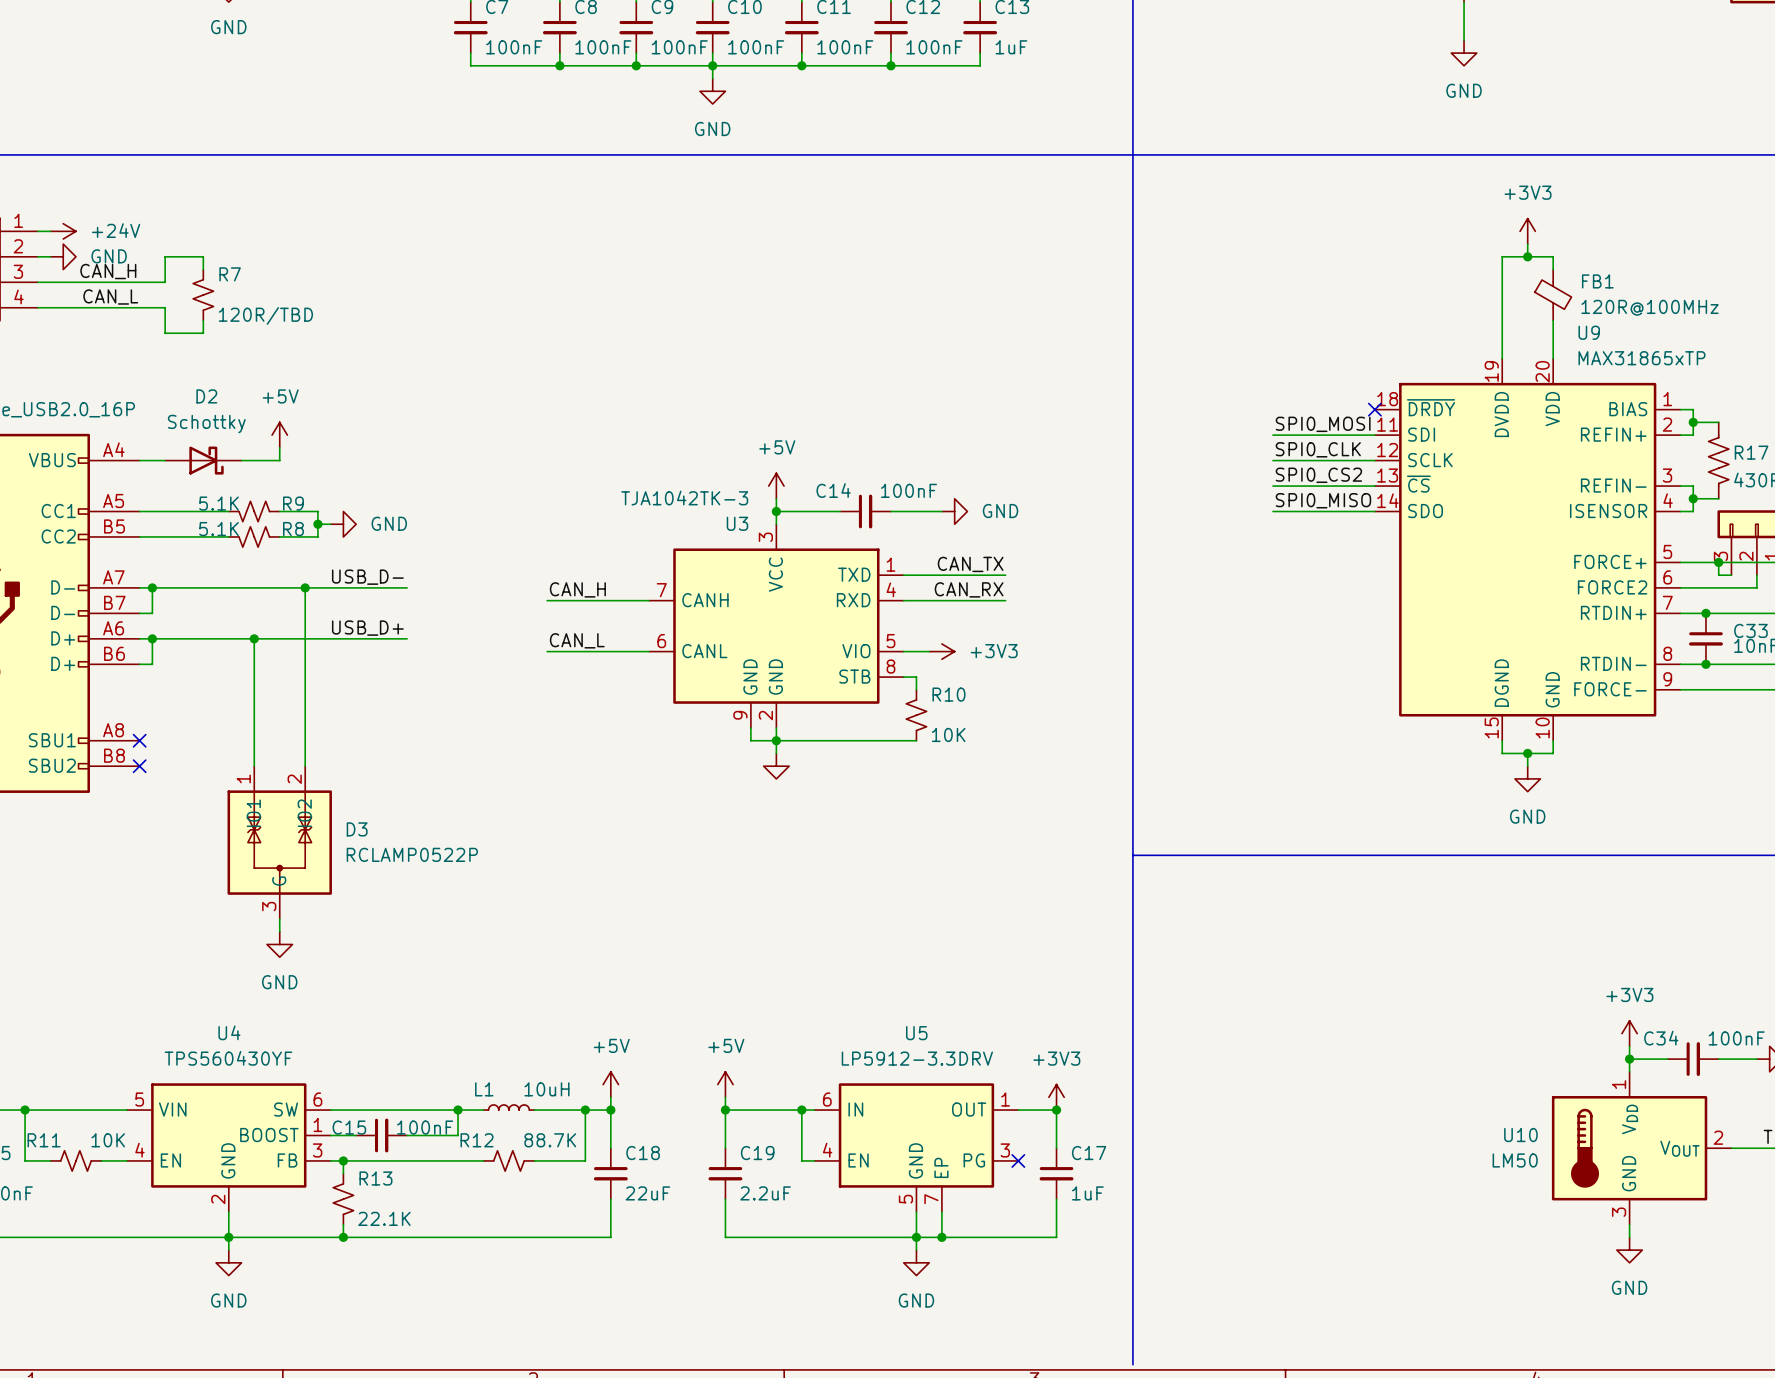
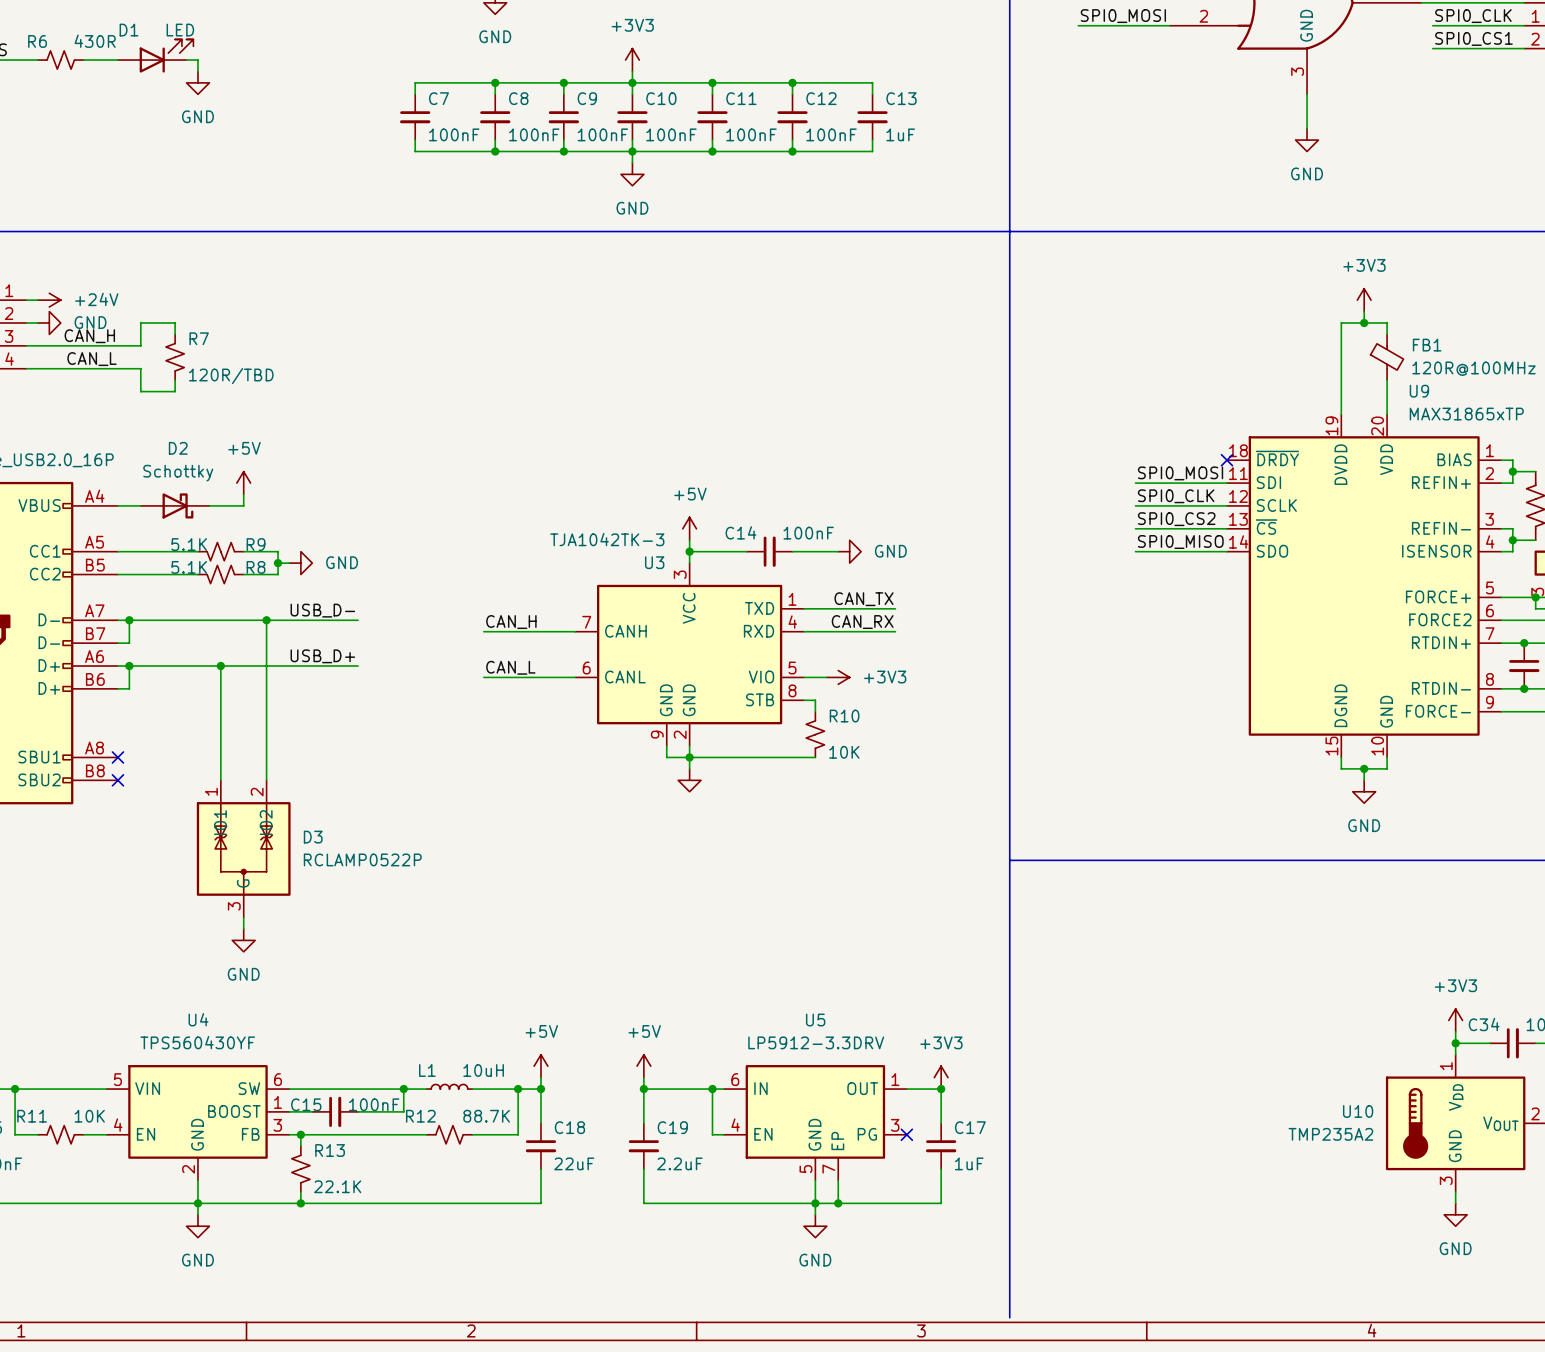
U10 value: LM50 (1515, 1160) -> TMP235A2 (1330, 1134)

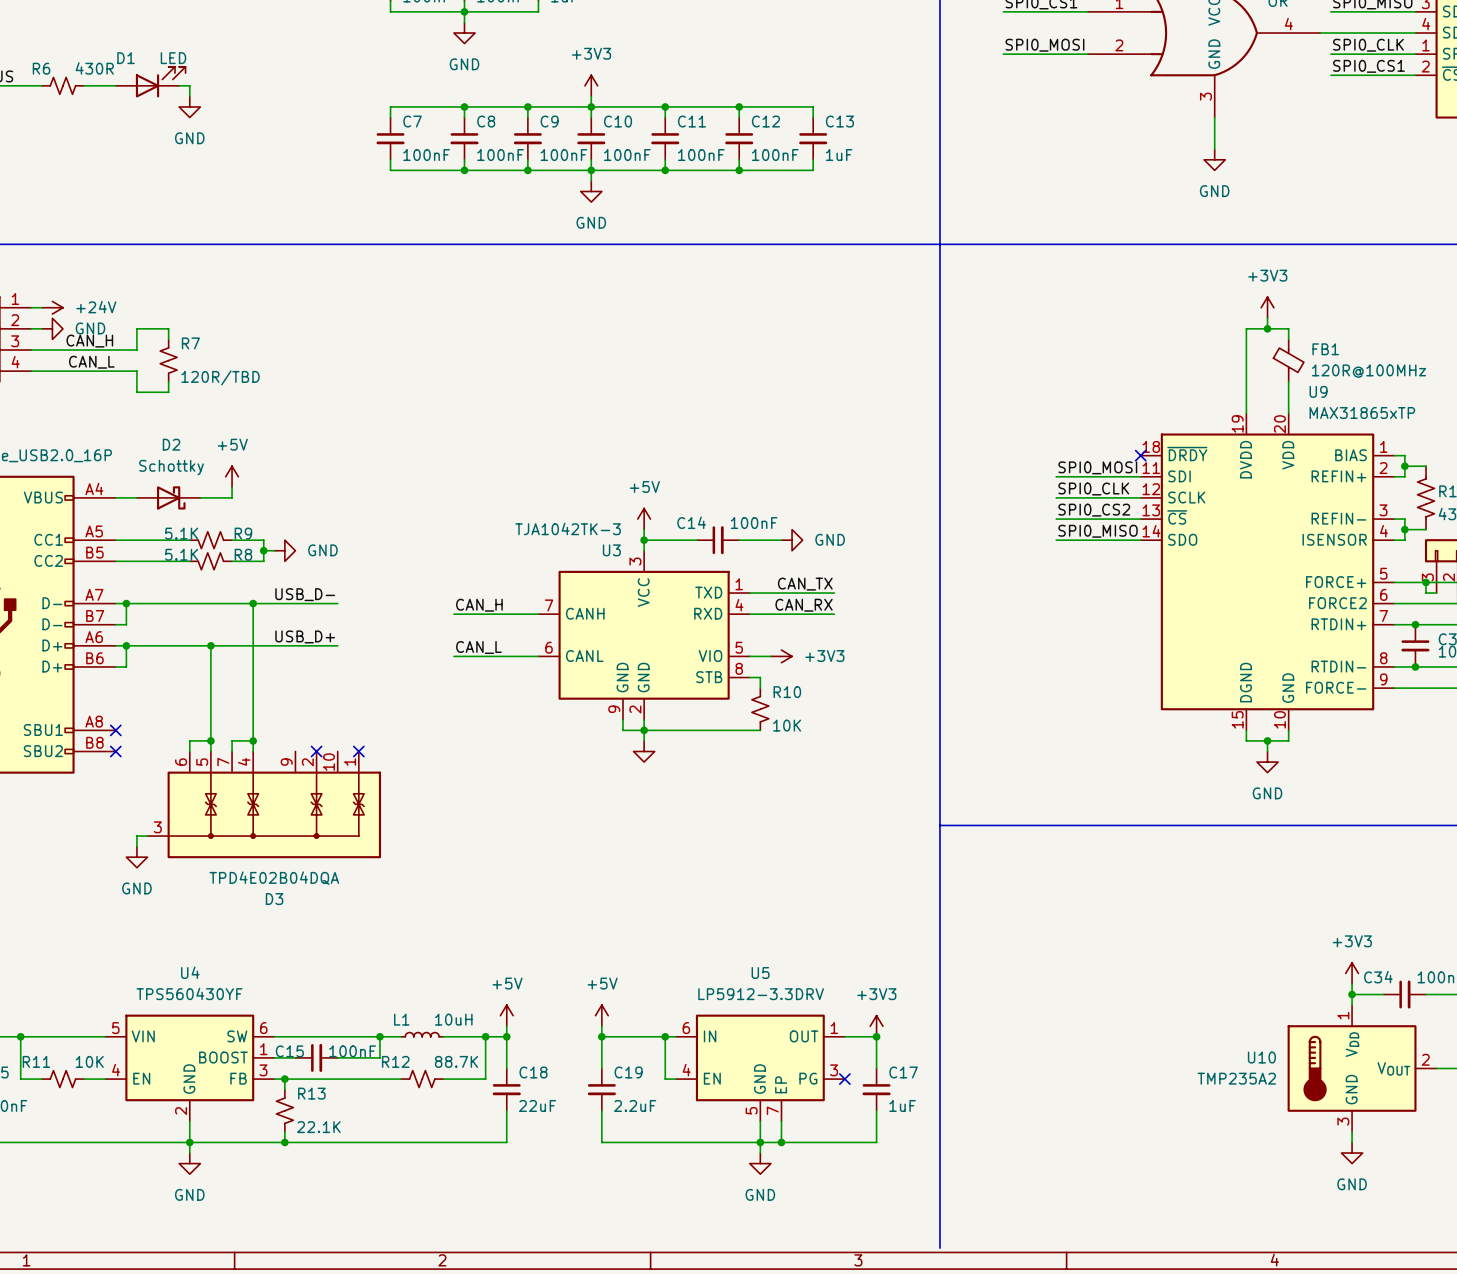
wire: none -> (210, 740) (189, 740) (189, 751)
junction: none -> (210, 740)
wire: none -> (253, 740) (232, 740) (232, 751)
junction: none -> (253, 740)
D3 symbol: [196, 780, 291, 918] -> [147, 751, 382, 859]
no-connect mark: none -> (316, 751)
no-connect mark: none -> (358, 751)
D3 name position: D3 (313, 837) -> D3 (274, 899)
D3 value: RCLAMP0522P (362, 859) -> TPD4E02B04DQA (274, 878)
wire: none -> (147, 836) (136, 836) (136, 846)
wire: (243, 917) (243, 928) -> none
power symbol position: GND (243, 940) -> GND (136, 857)

